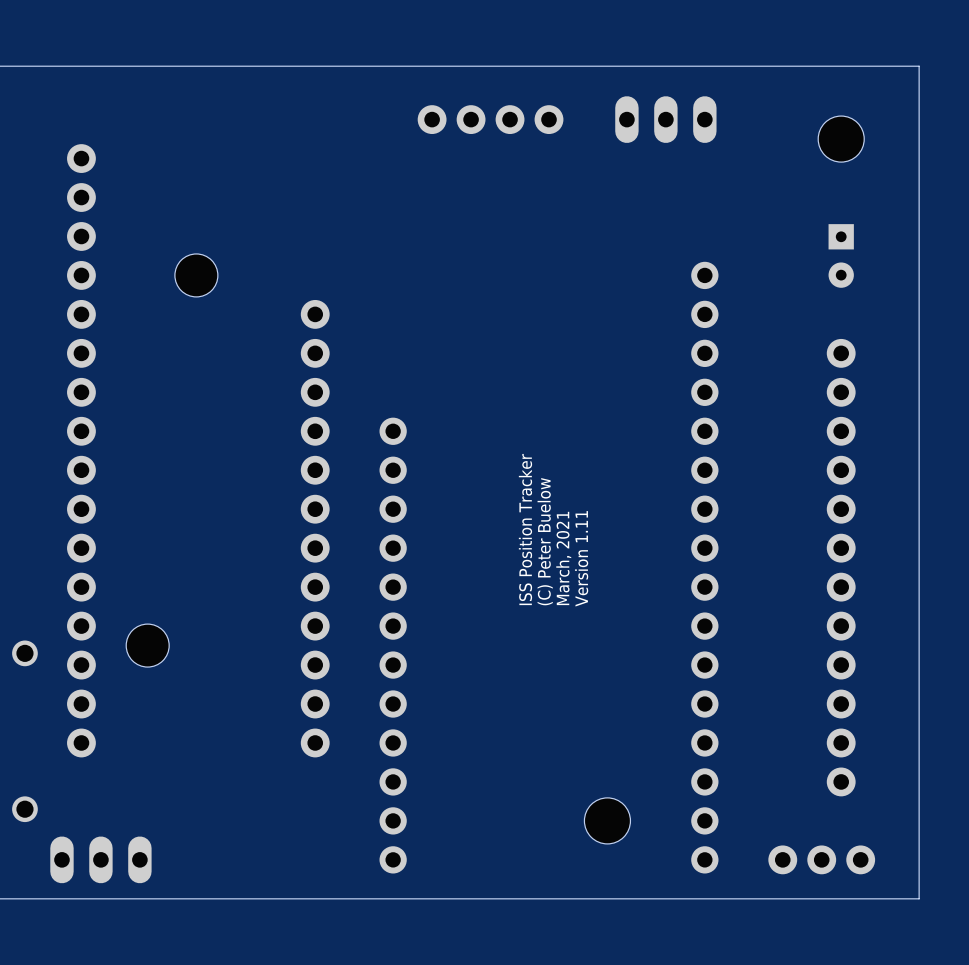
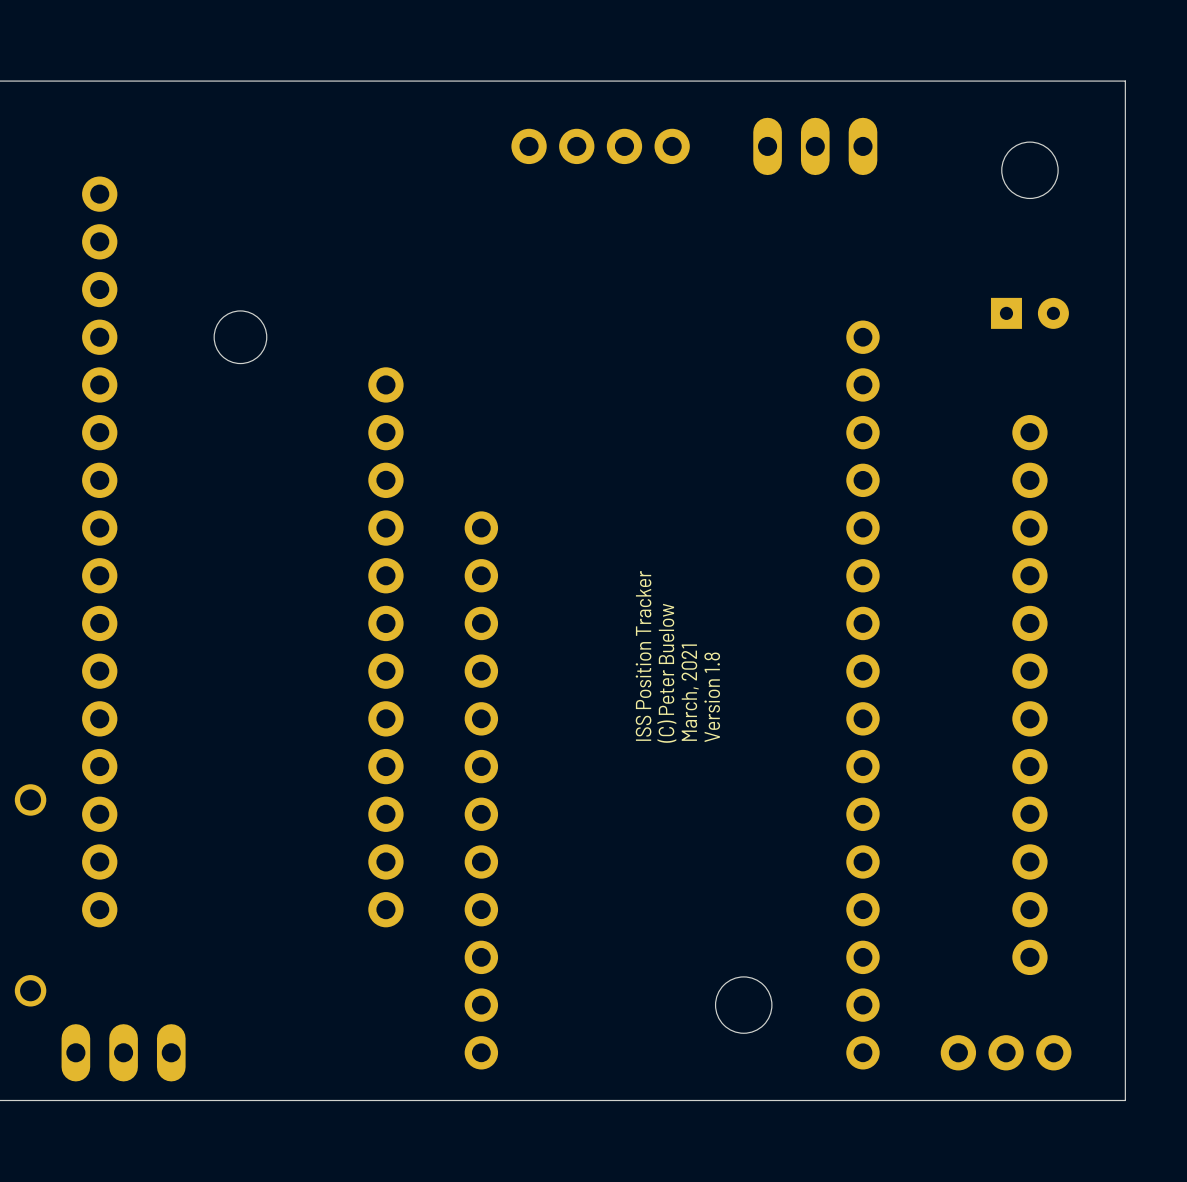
part rotation: 0° (841, 255) -> 90° counterclockwise (1029, 313)
text: Version 1.11 (581, 558) -> Version 1.8 (712, 697)
part: (147, 645) -> none

